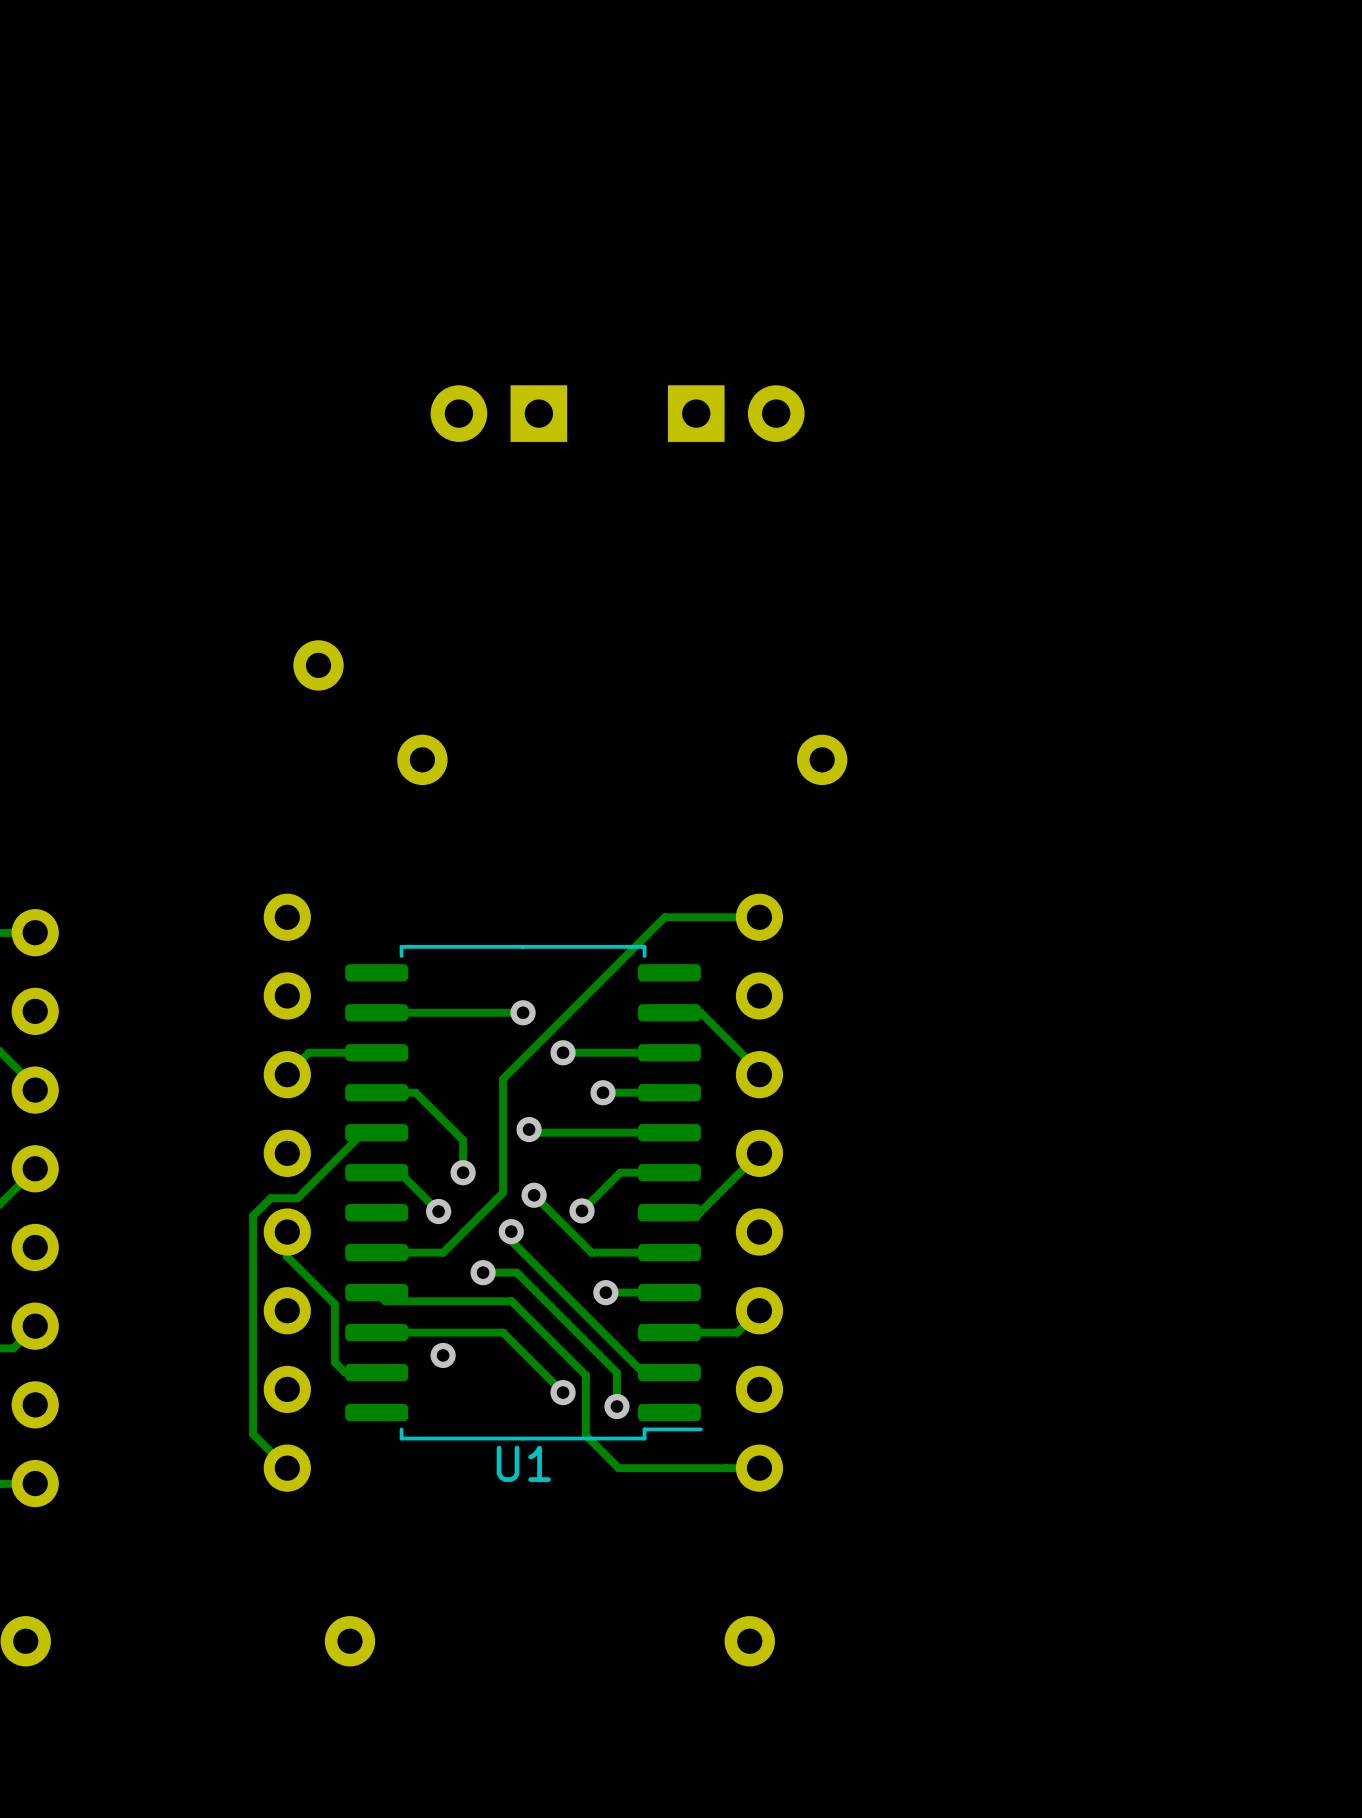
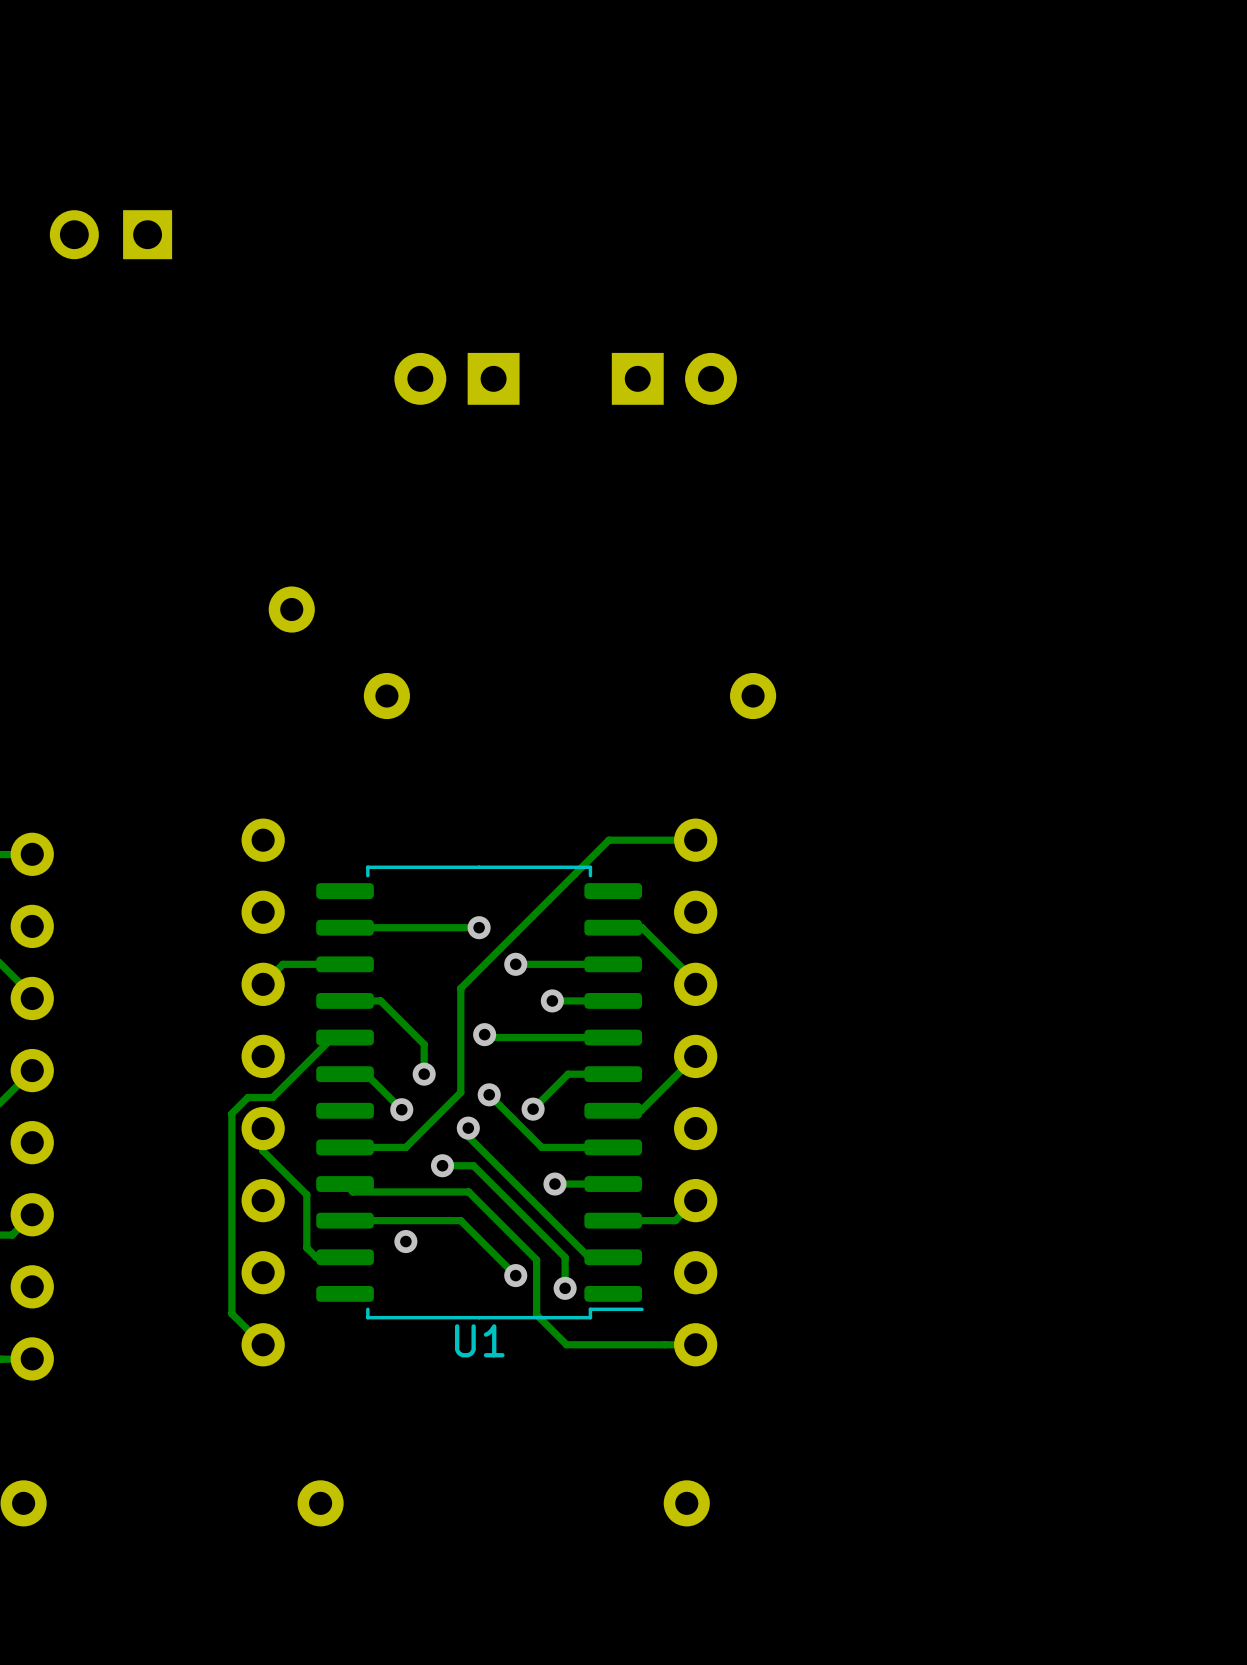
part: none -> (110, 234)

